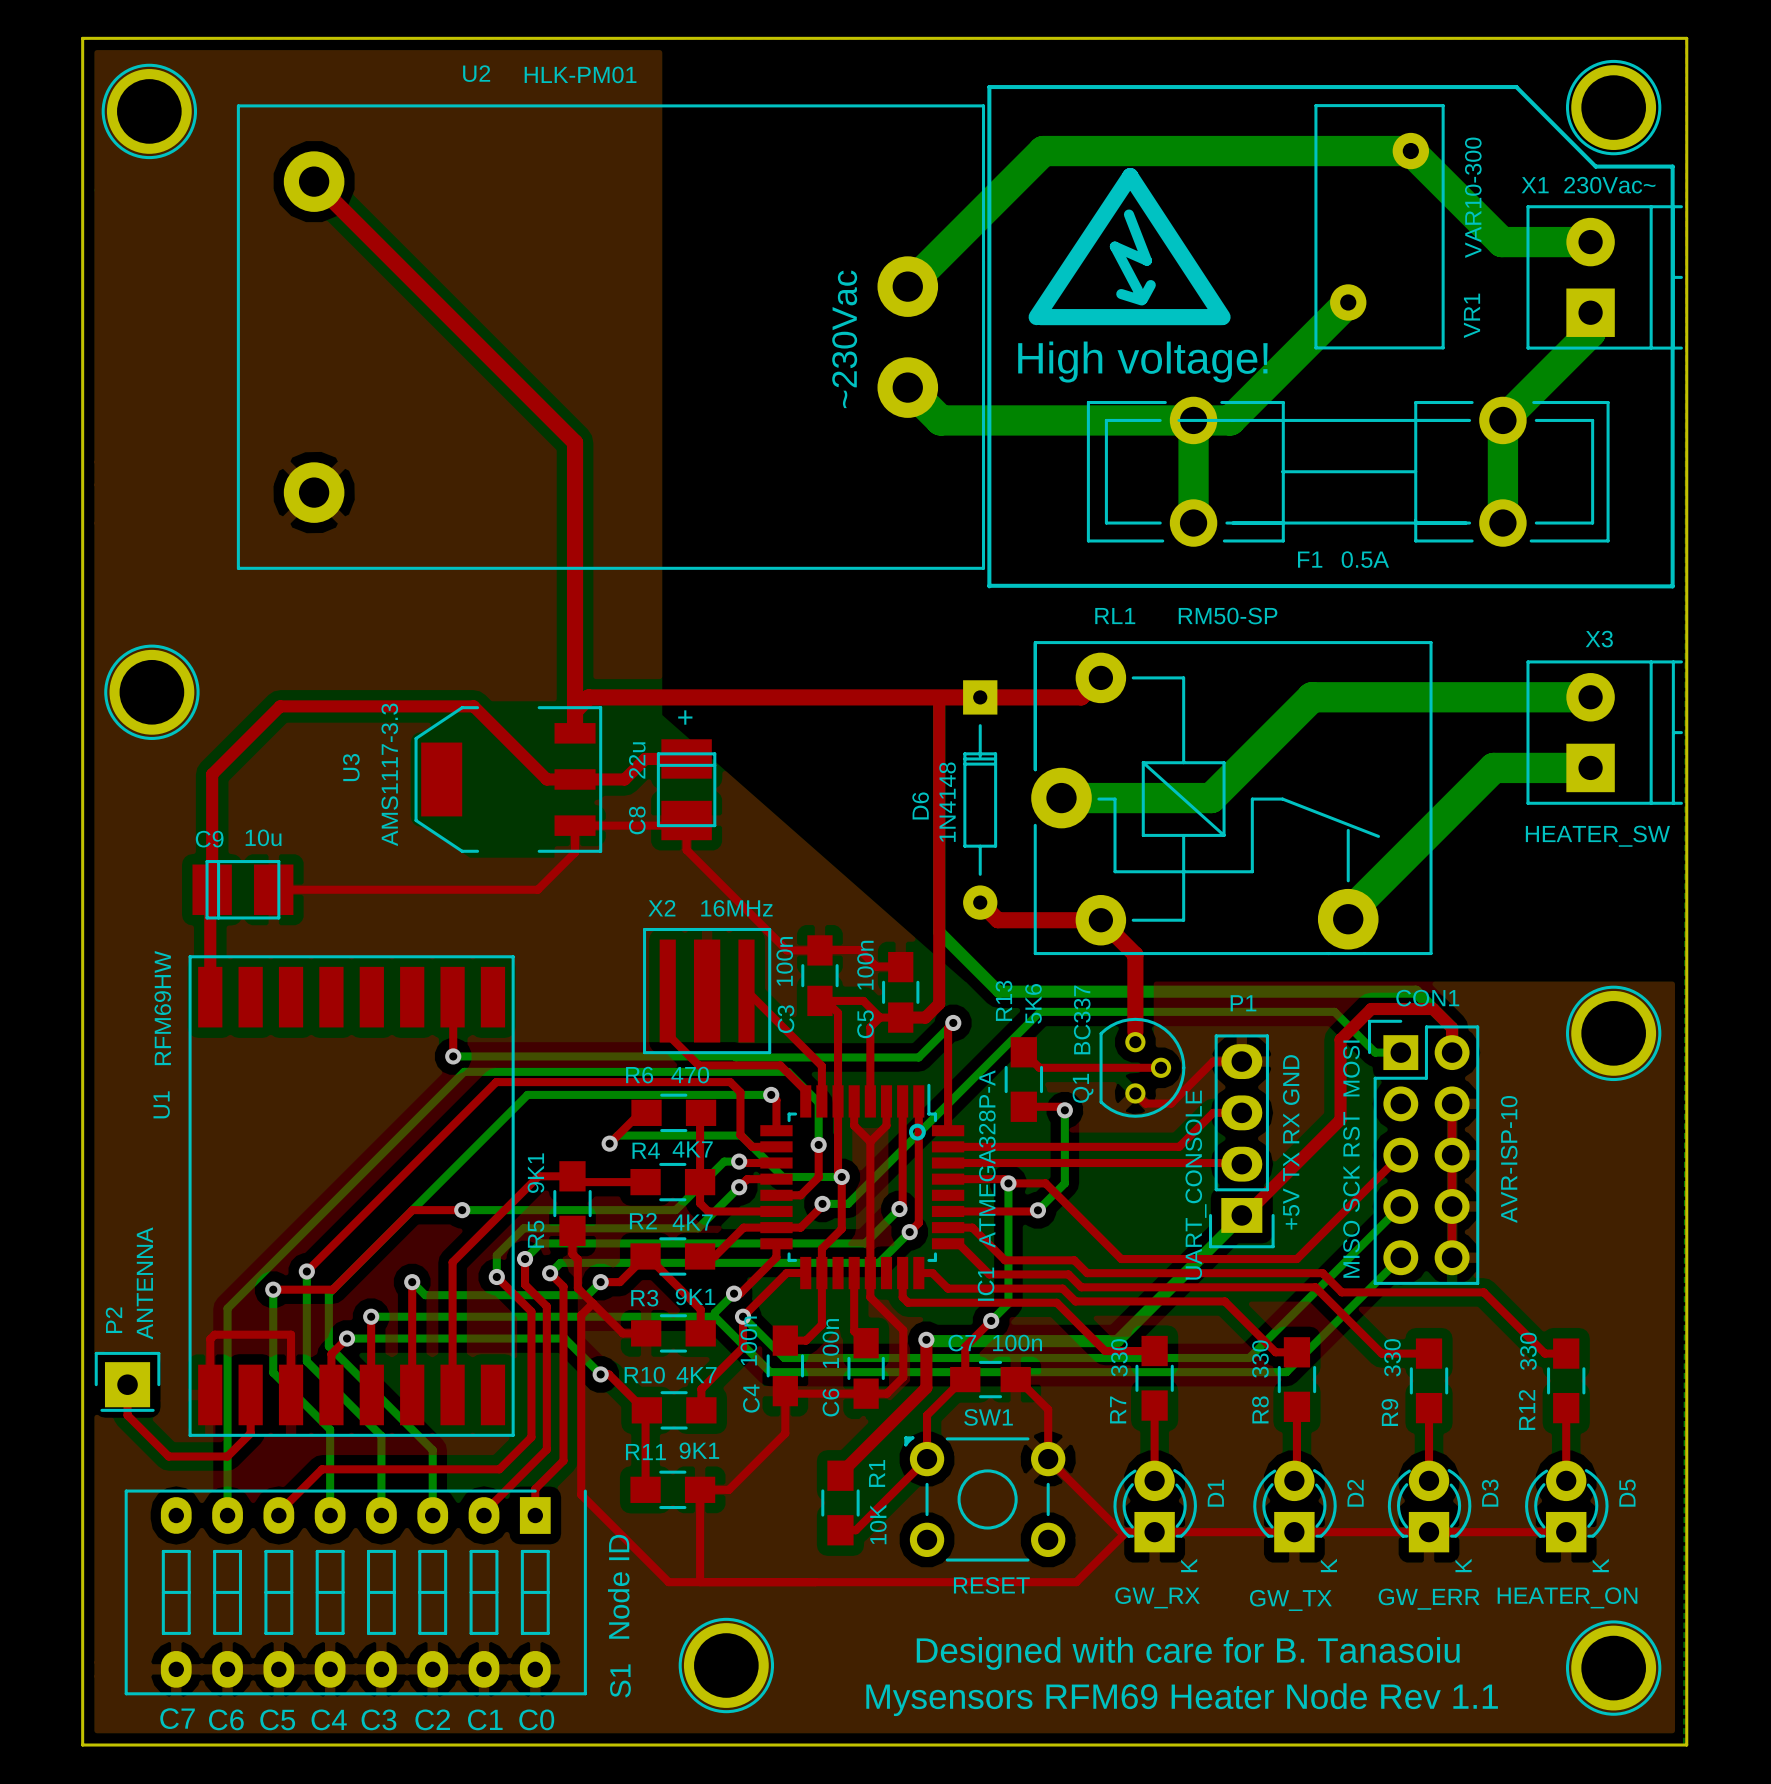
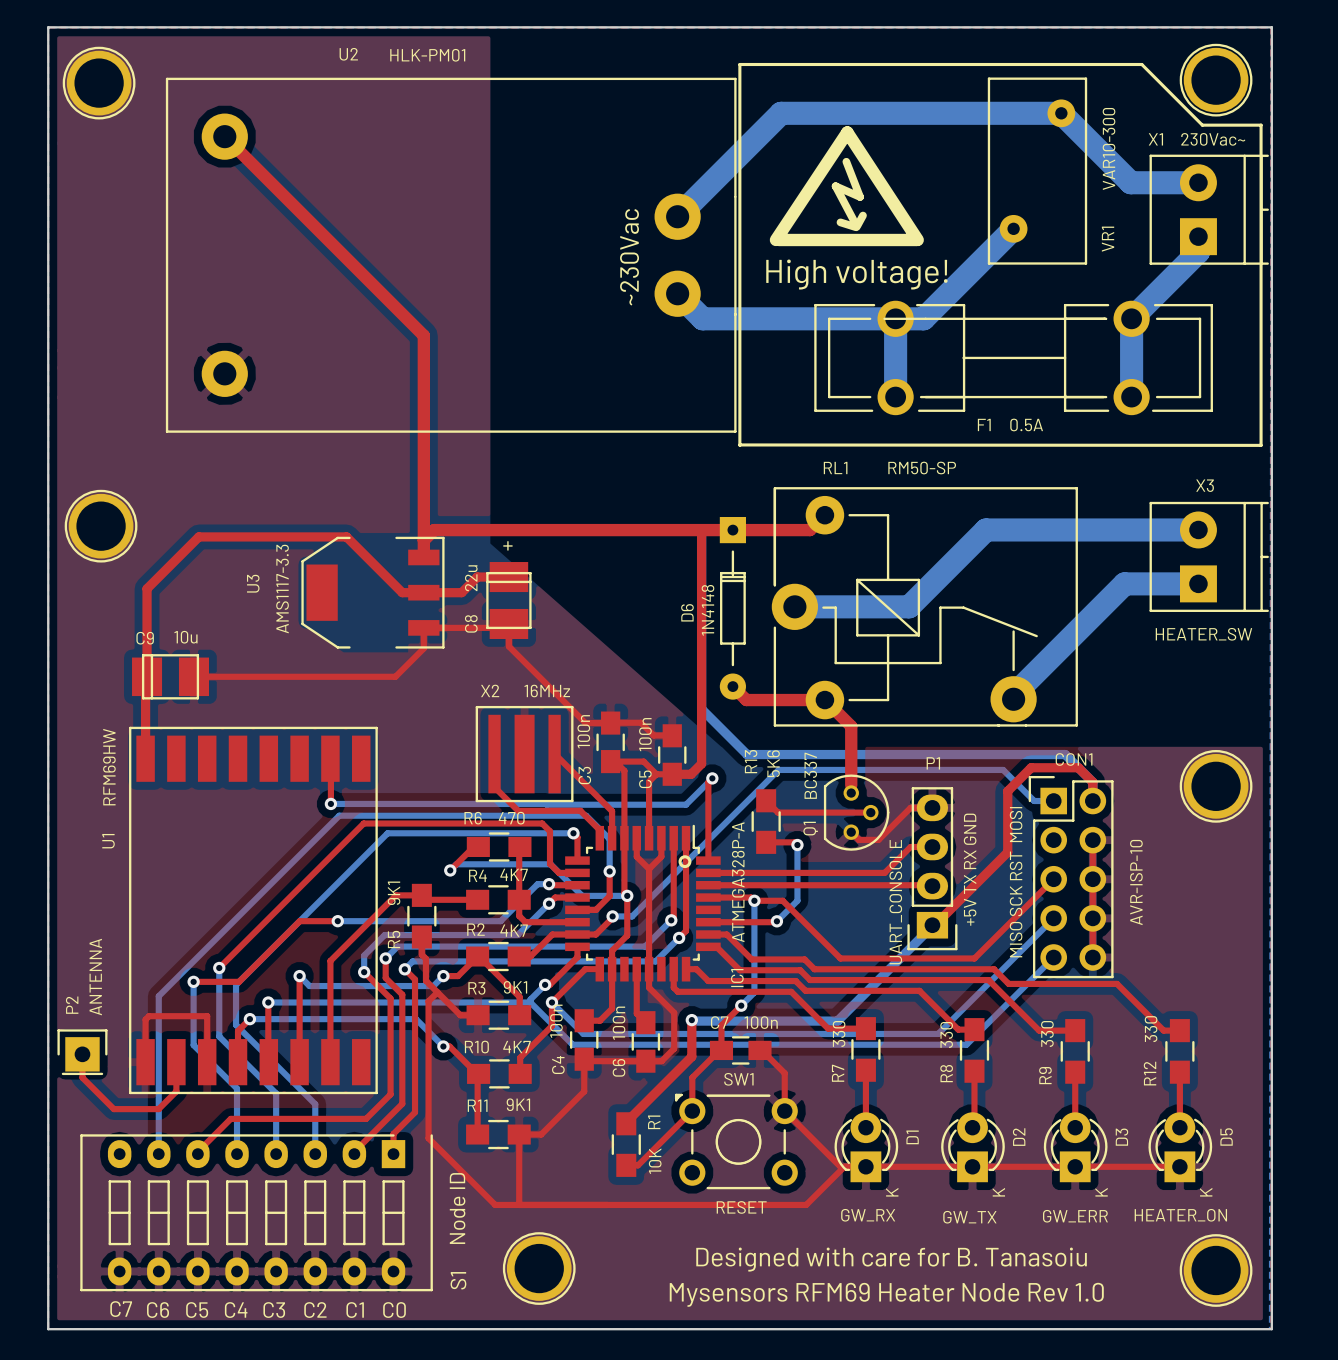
text: Mysensors RFM69 Heater Node Rev 1.1 (1182, 1699) -> Mysensors RFM69 Heater Node Rev 1.0 (886, 1294)

